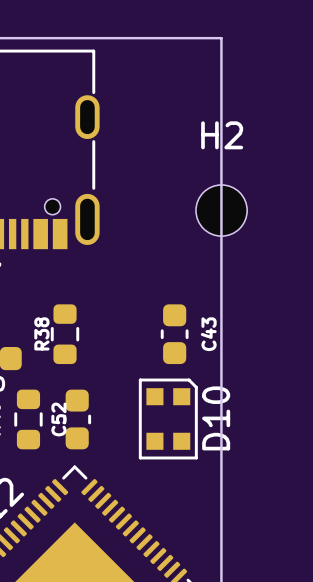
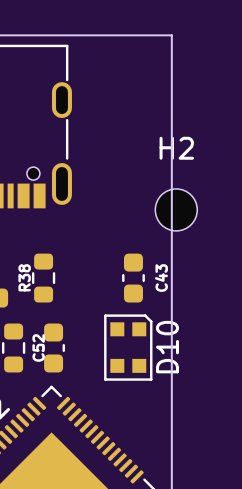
H2 position: (221, 210) -> (176, 209)

